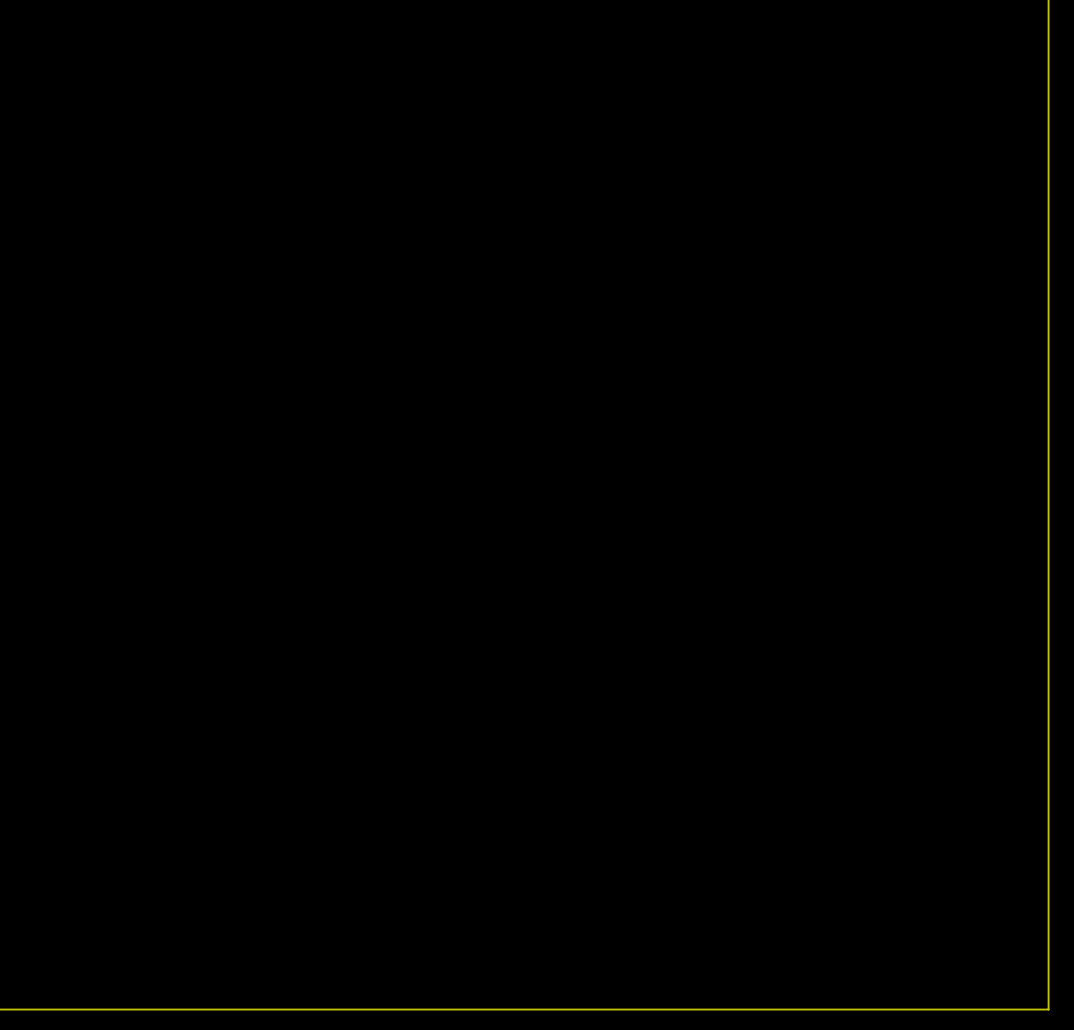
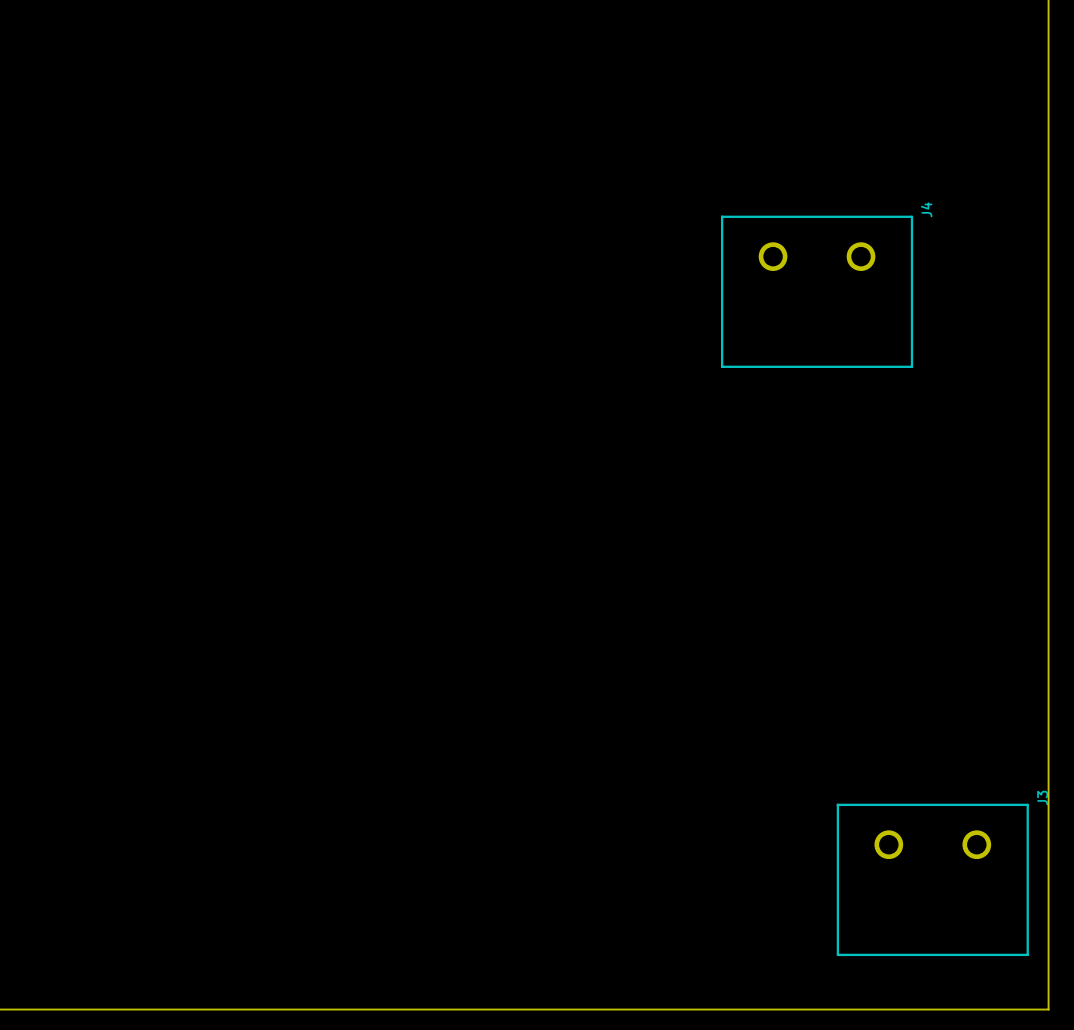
J4: none -> (817, 291)
J3: none -> (932, 879)

